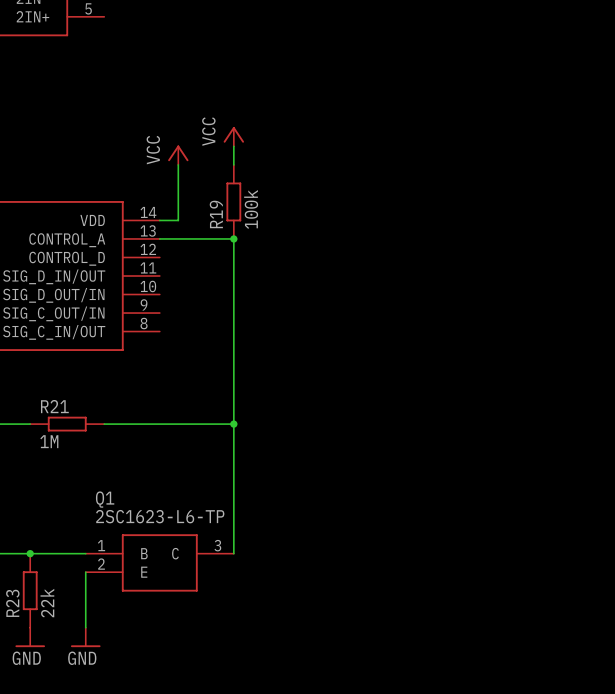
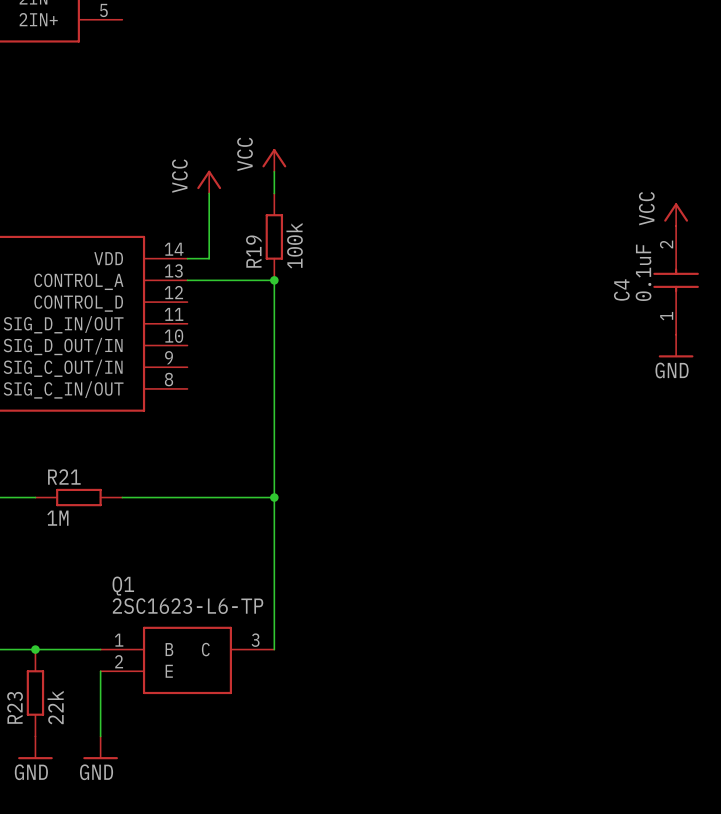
power symbol: none -> VCC (676, 214)
C4: none -> 0.1uF (676, 280)
power symbol: none -> GND (676, 346)

